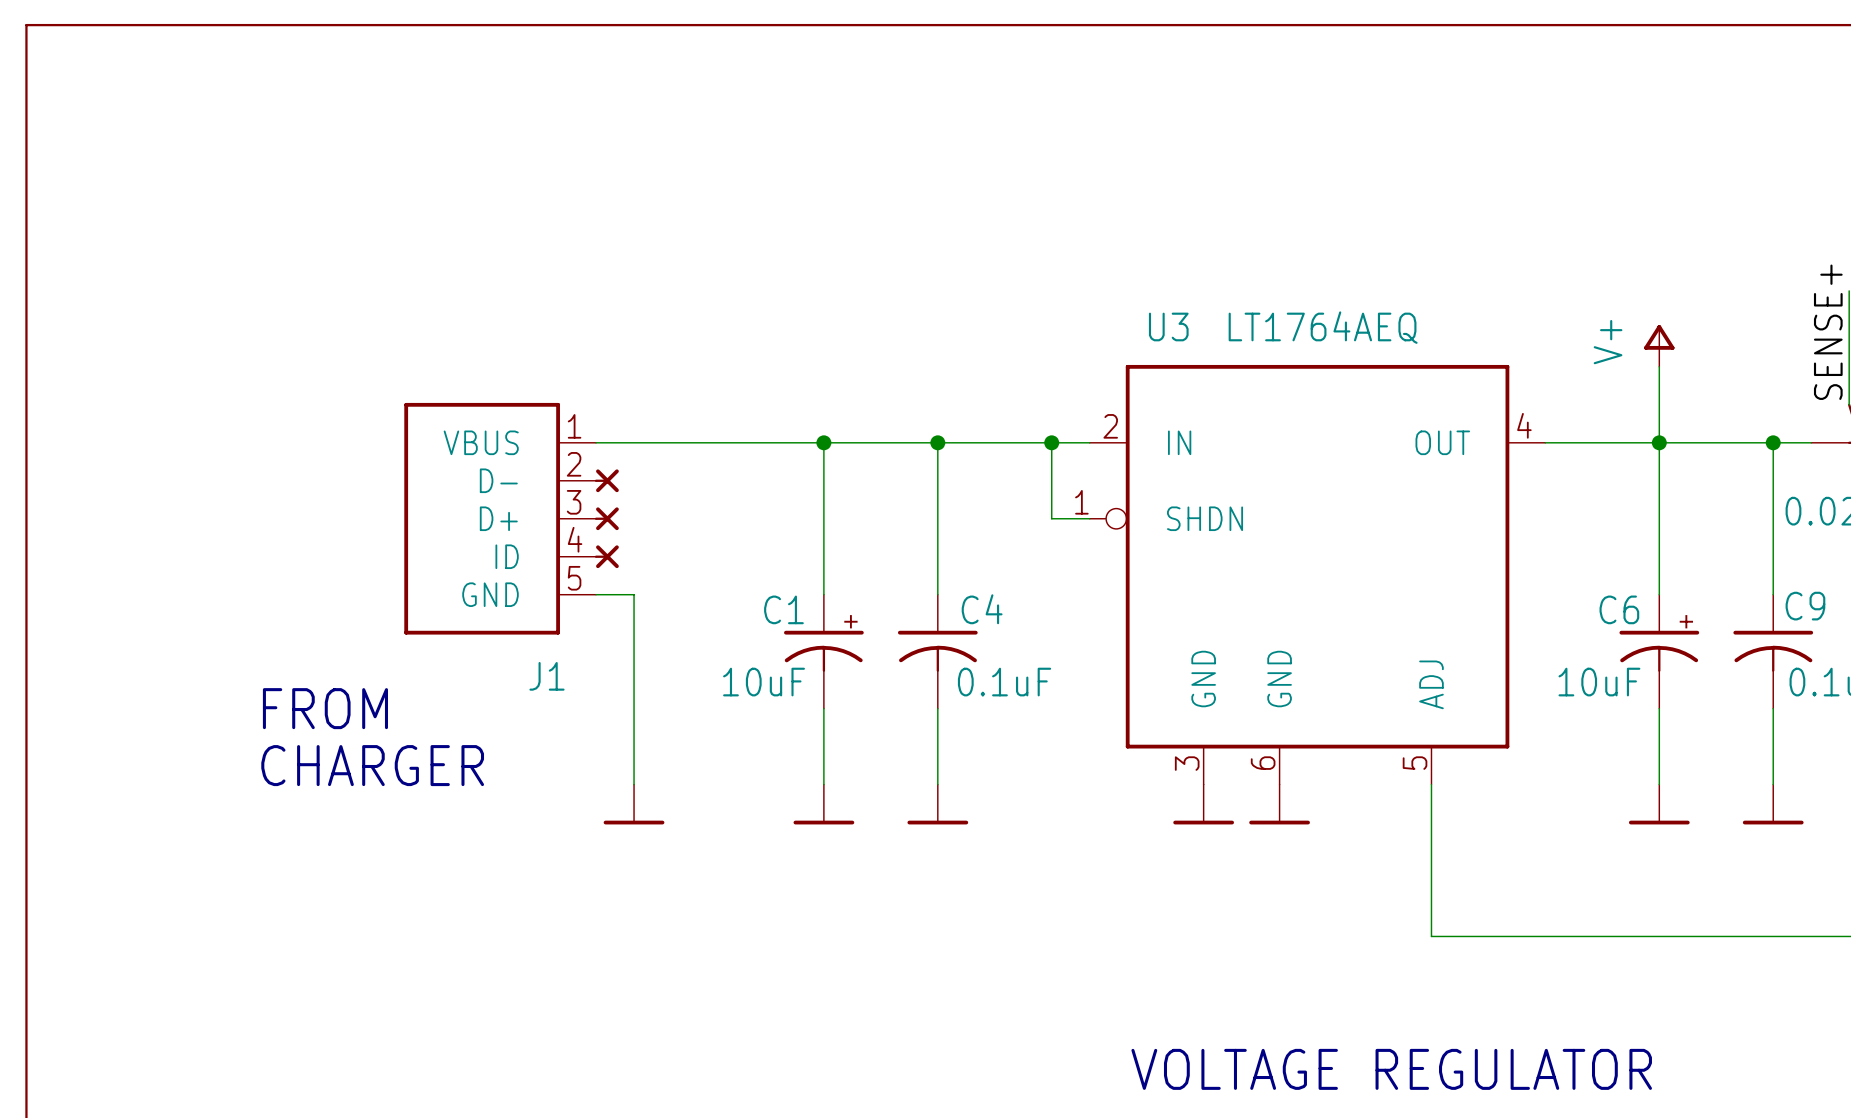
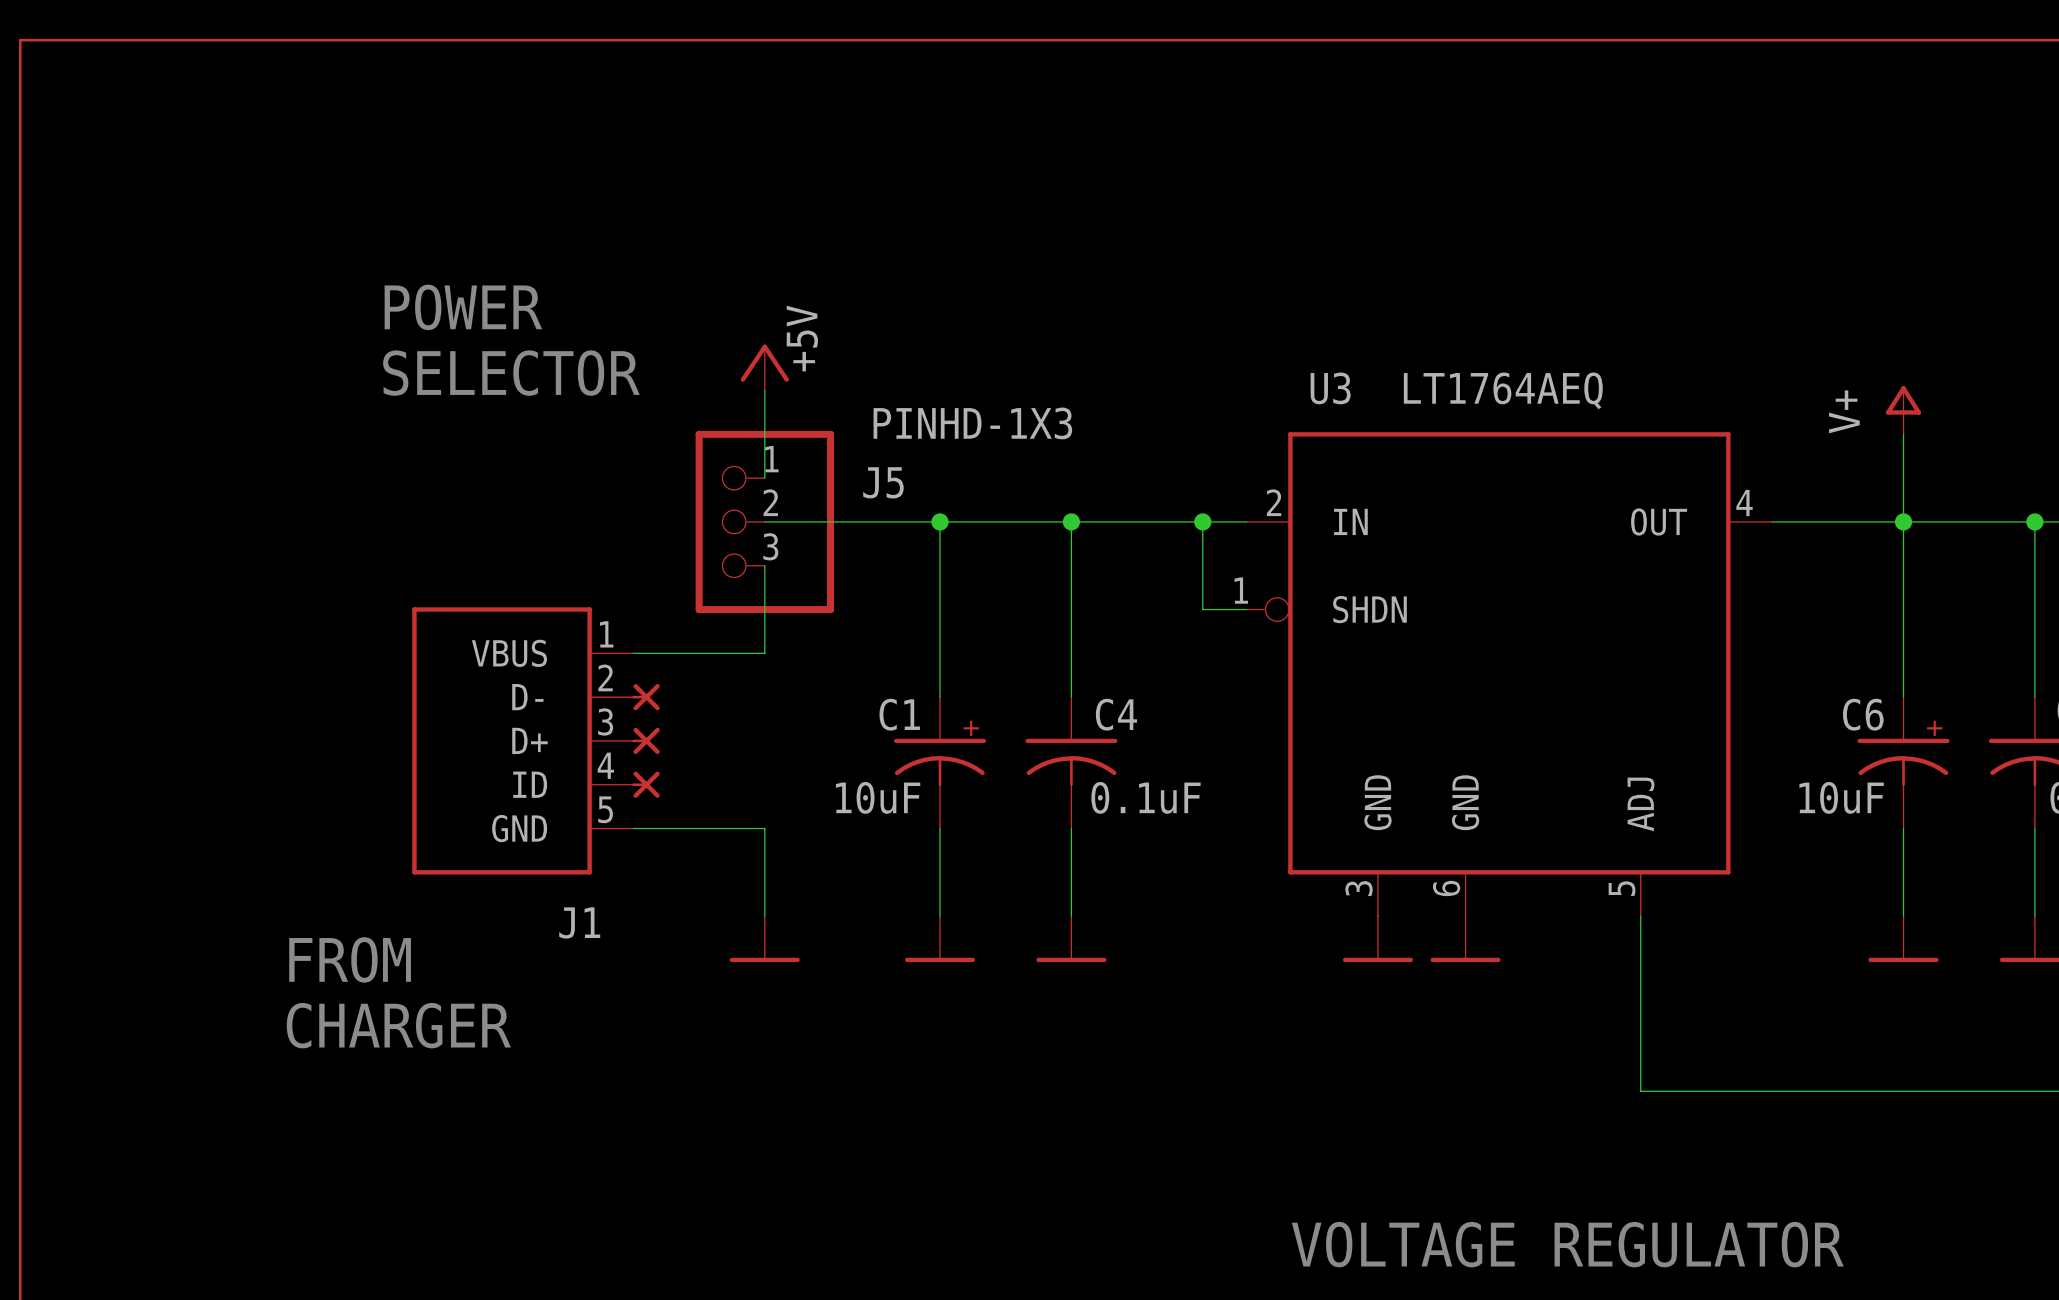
text: none -> POWER (463, 307)
power symbol: none -> +5V (764, 367)
text: none -> SELECTOR (511, 373)
wire: none -> (764, 390) (764, 478)
wire: (596, 442) (672, 442) -> none
J5: none -> PINHD-1X3 (764, 521)
part: (606, 480) -> none
wire: none -> (764, 565) (764, 653) (633, 653)
J1 position: (500, 518) -> (522, 740)
part: (606, 518) -> none
part: (606, 556) -> none
part: none -> (645, 697)
wire: (596, 594) (634, 594) (634, 784) -> none
part: none -> (645, 740)
part: none -> (645, 784)
text position: FROM (325, 708) -> FROM (350, 959)
wire: none -> (633, 828) (764, 828) (764, 916)
text position: CHARGER (372, 765) -> CHARGER (398, 1025)
power symbol position: (634, 804) -> (764, 939)

